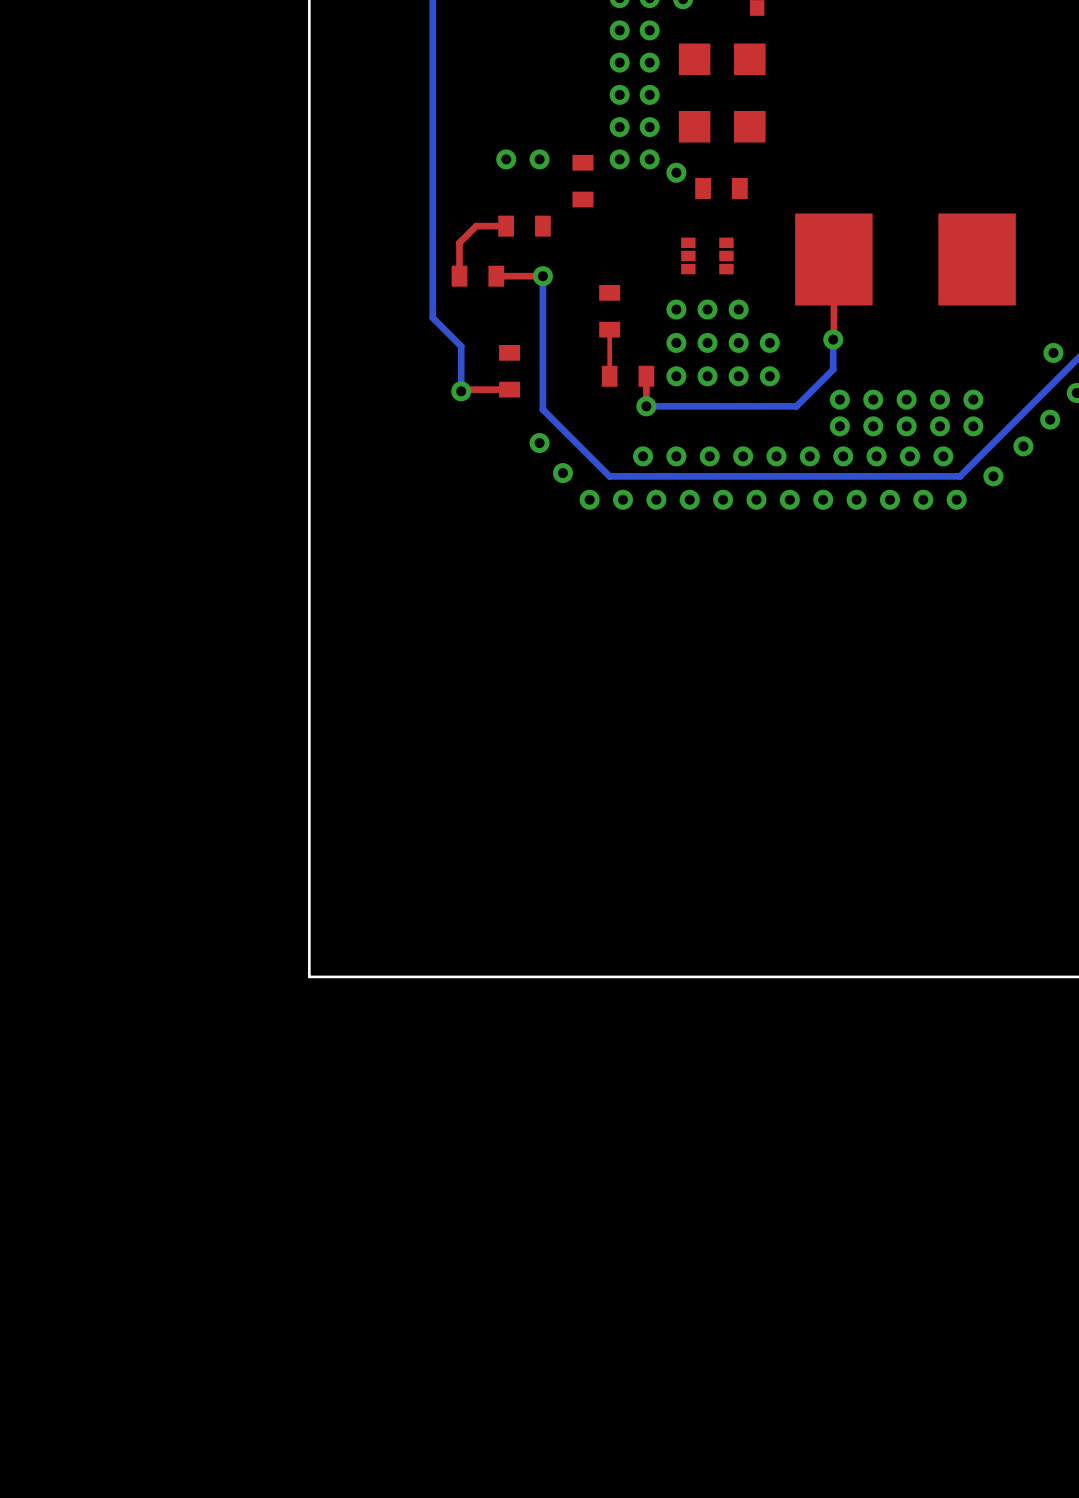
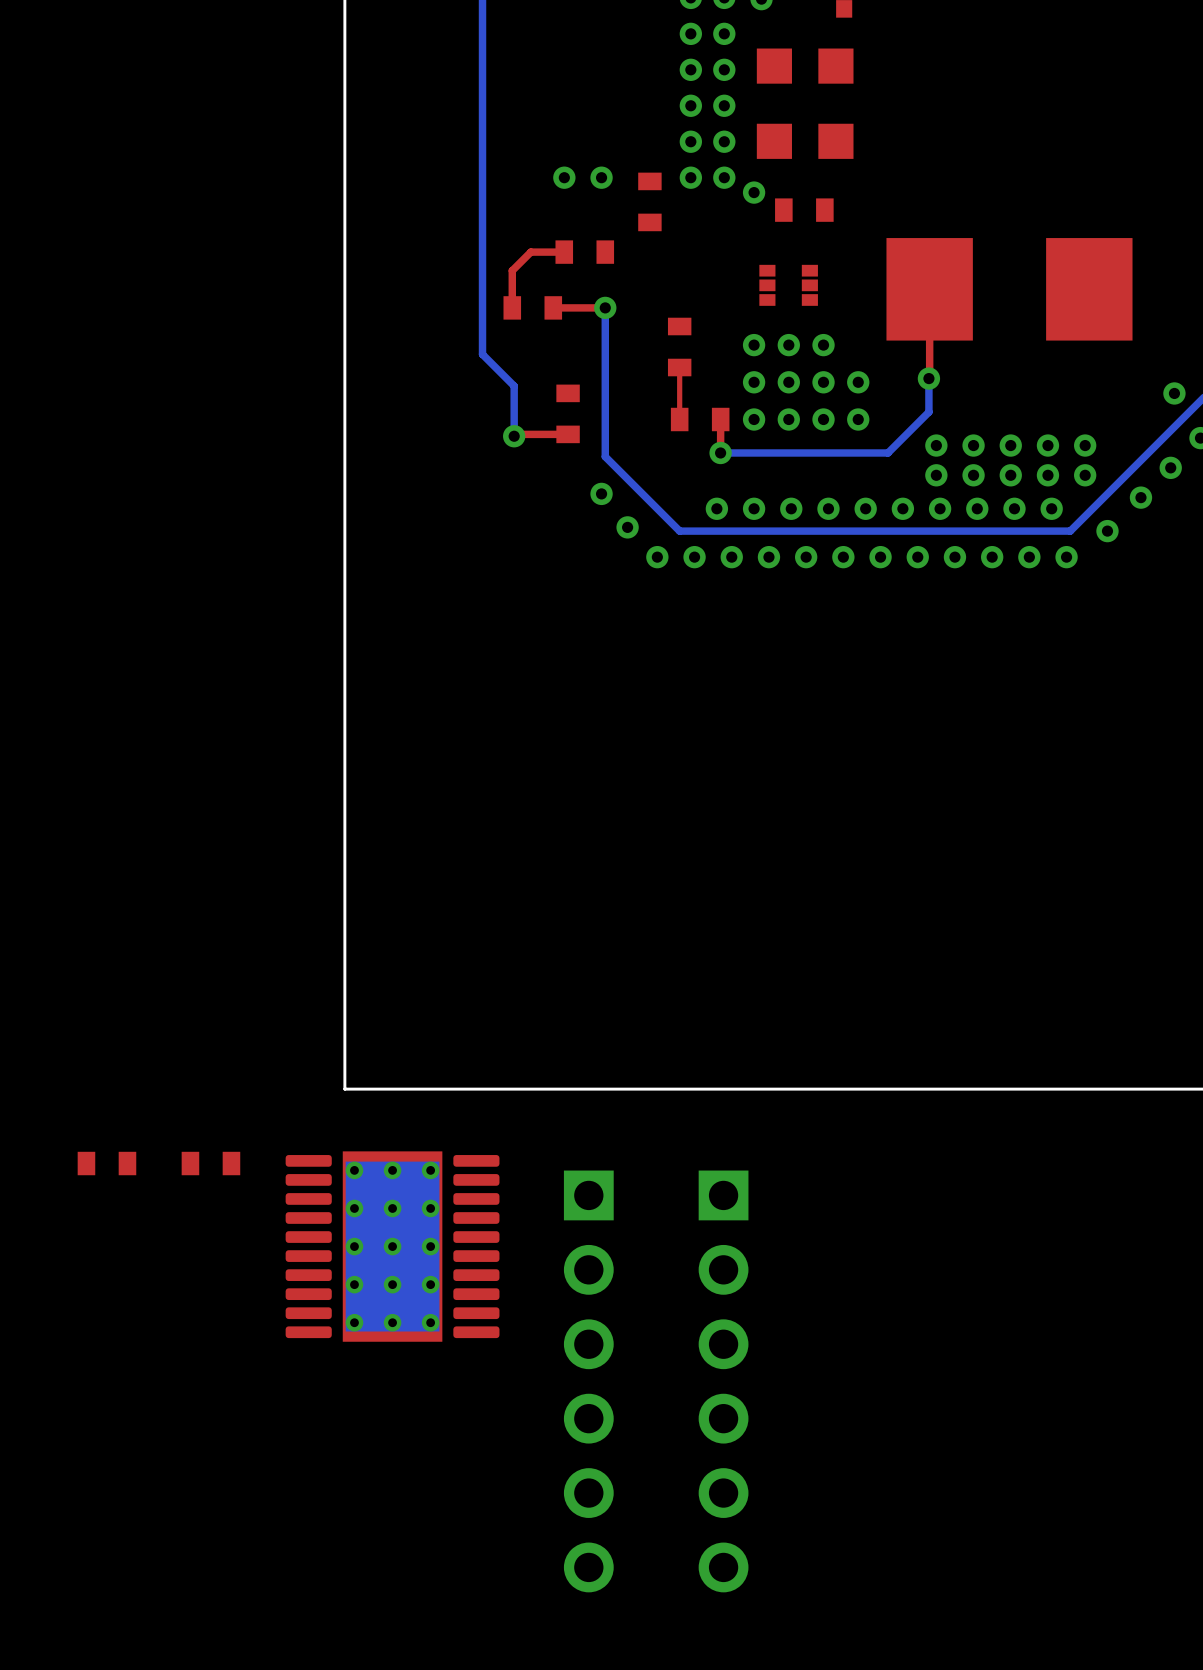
part: none -> (106, 1163)
part: none -> (210, 1163)
part: none -> (392, 1246)
part: none -> (588, 1381)
part: none -> (723, 1381)

